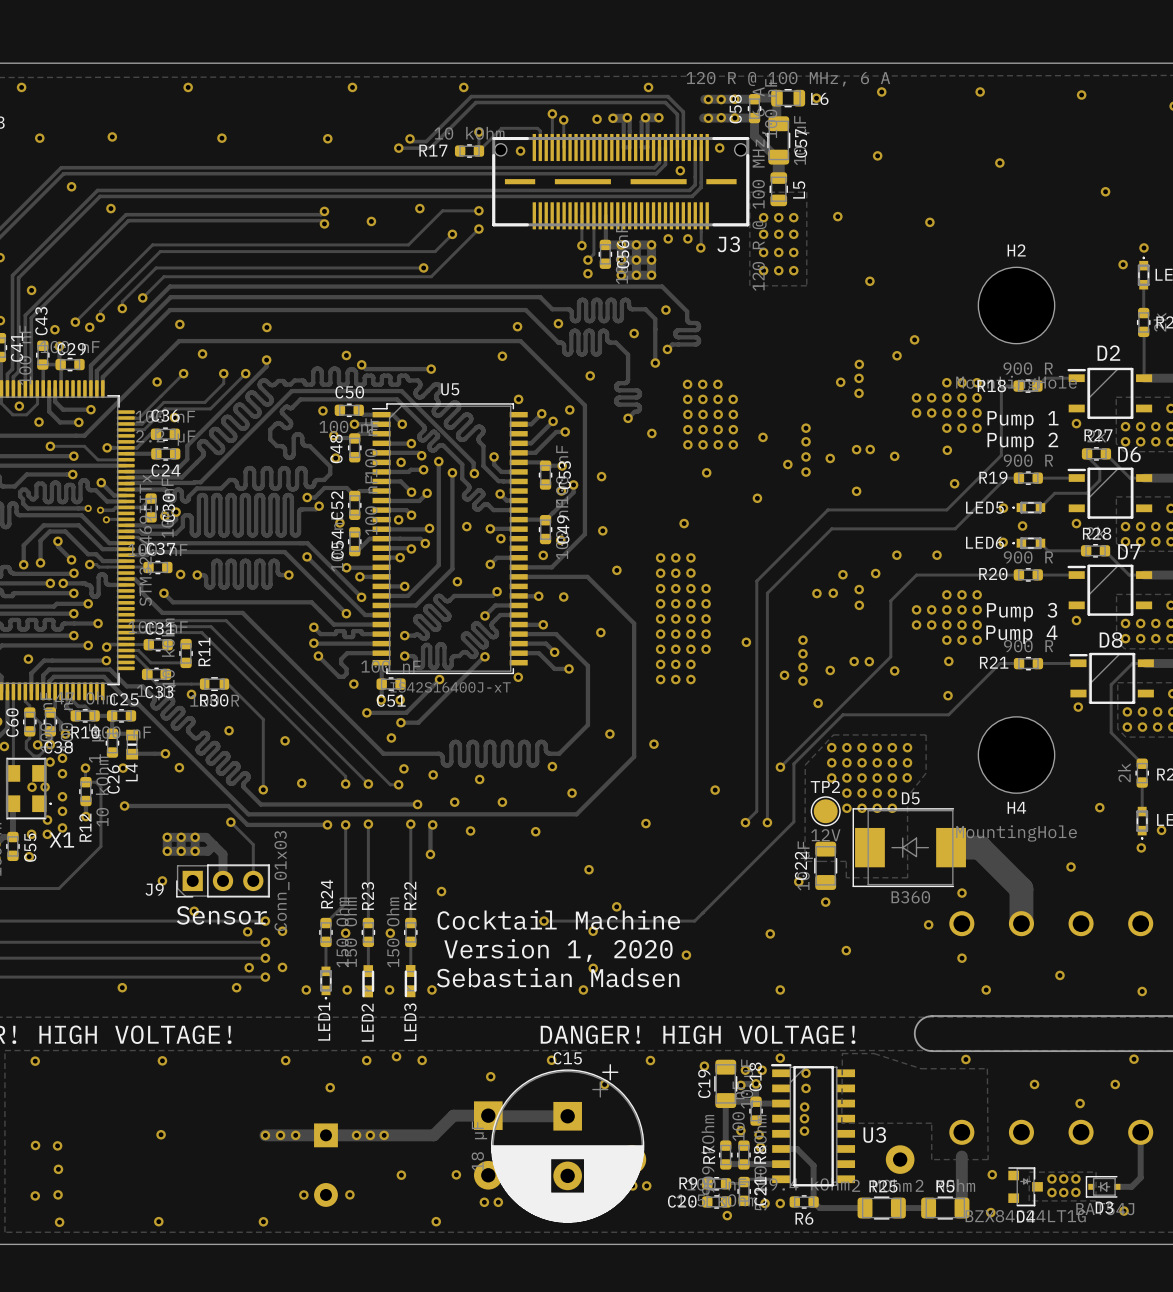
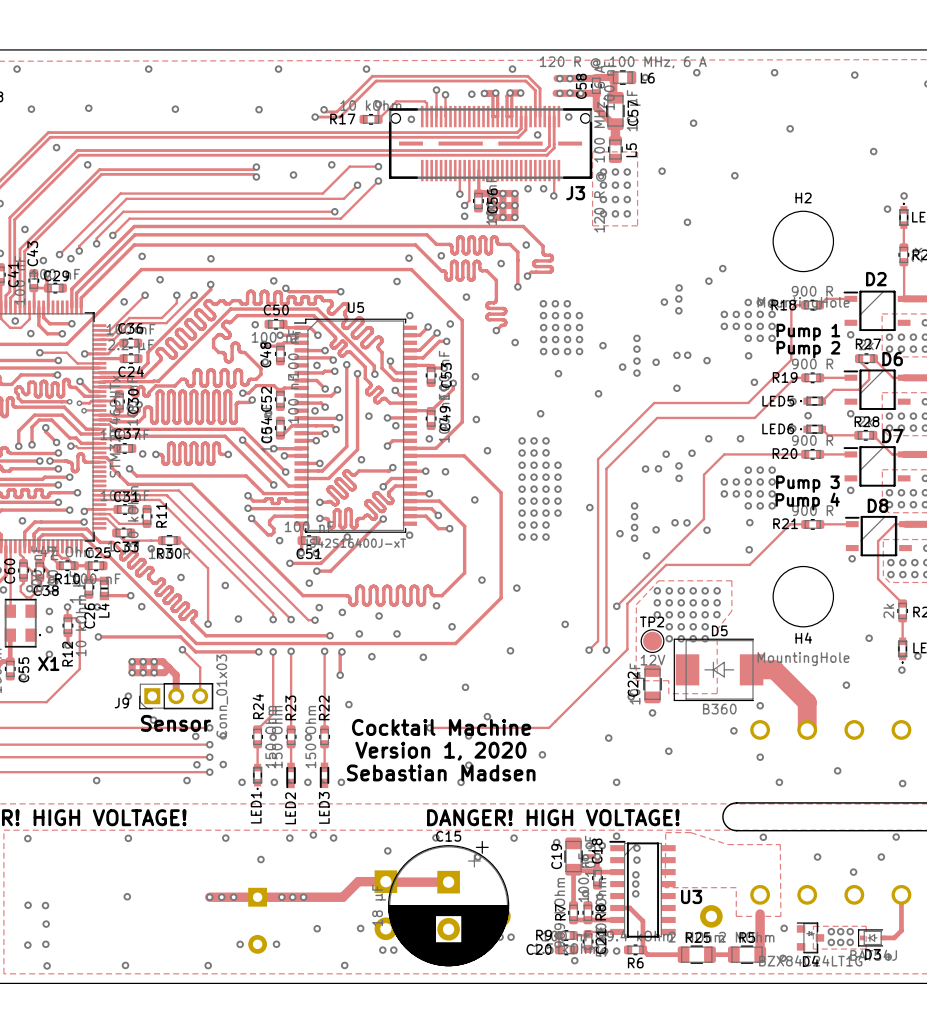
via: (62, 758) -> none
via: (50, 762) -> none
via: (32, 787) -> none
via: (45, 787) -> none
via: (62, 811) -> none
via: (47, 820) -> none
via: (31, 834) -> none
via: (47, 834) -> none

